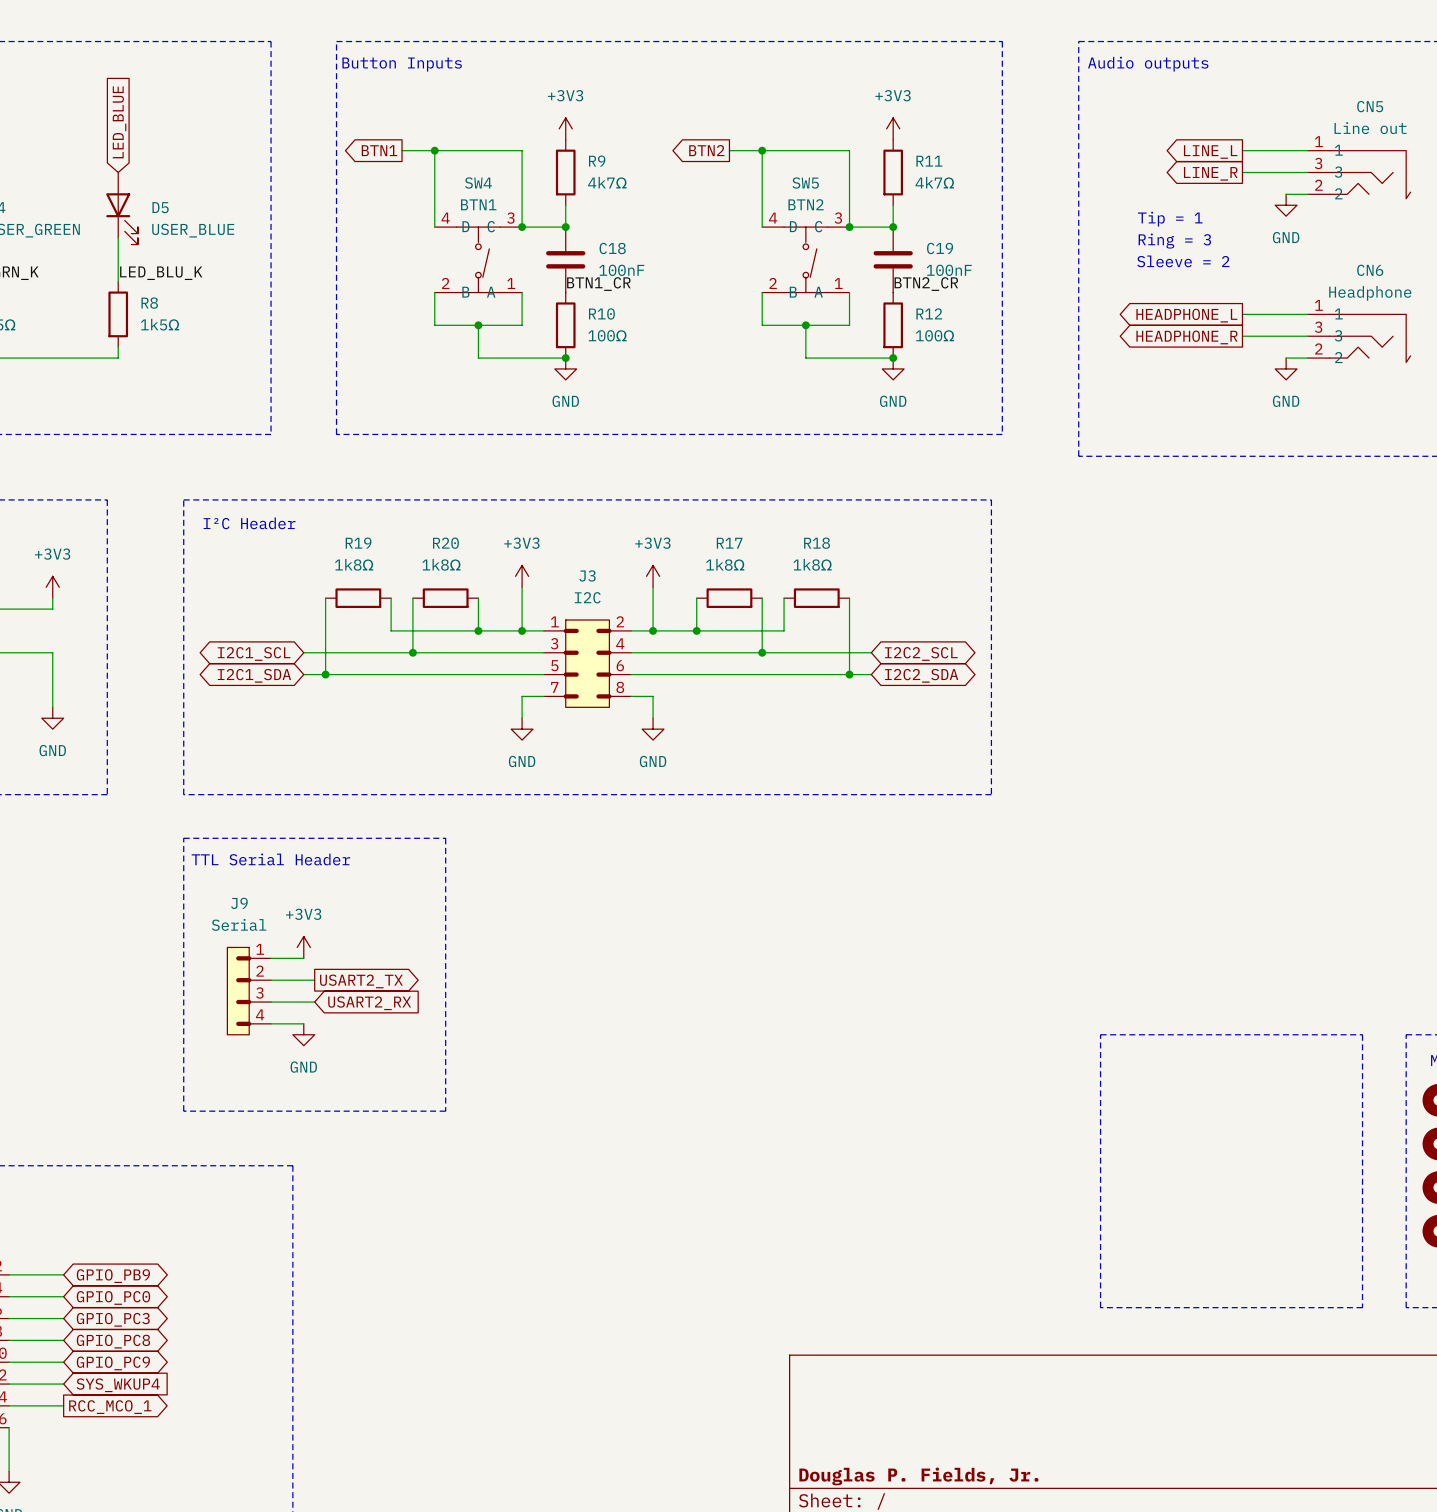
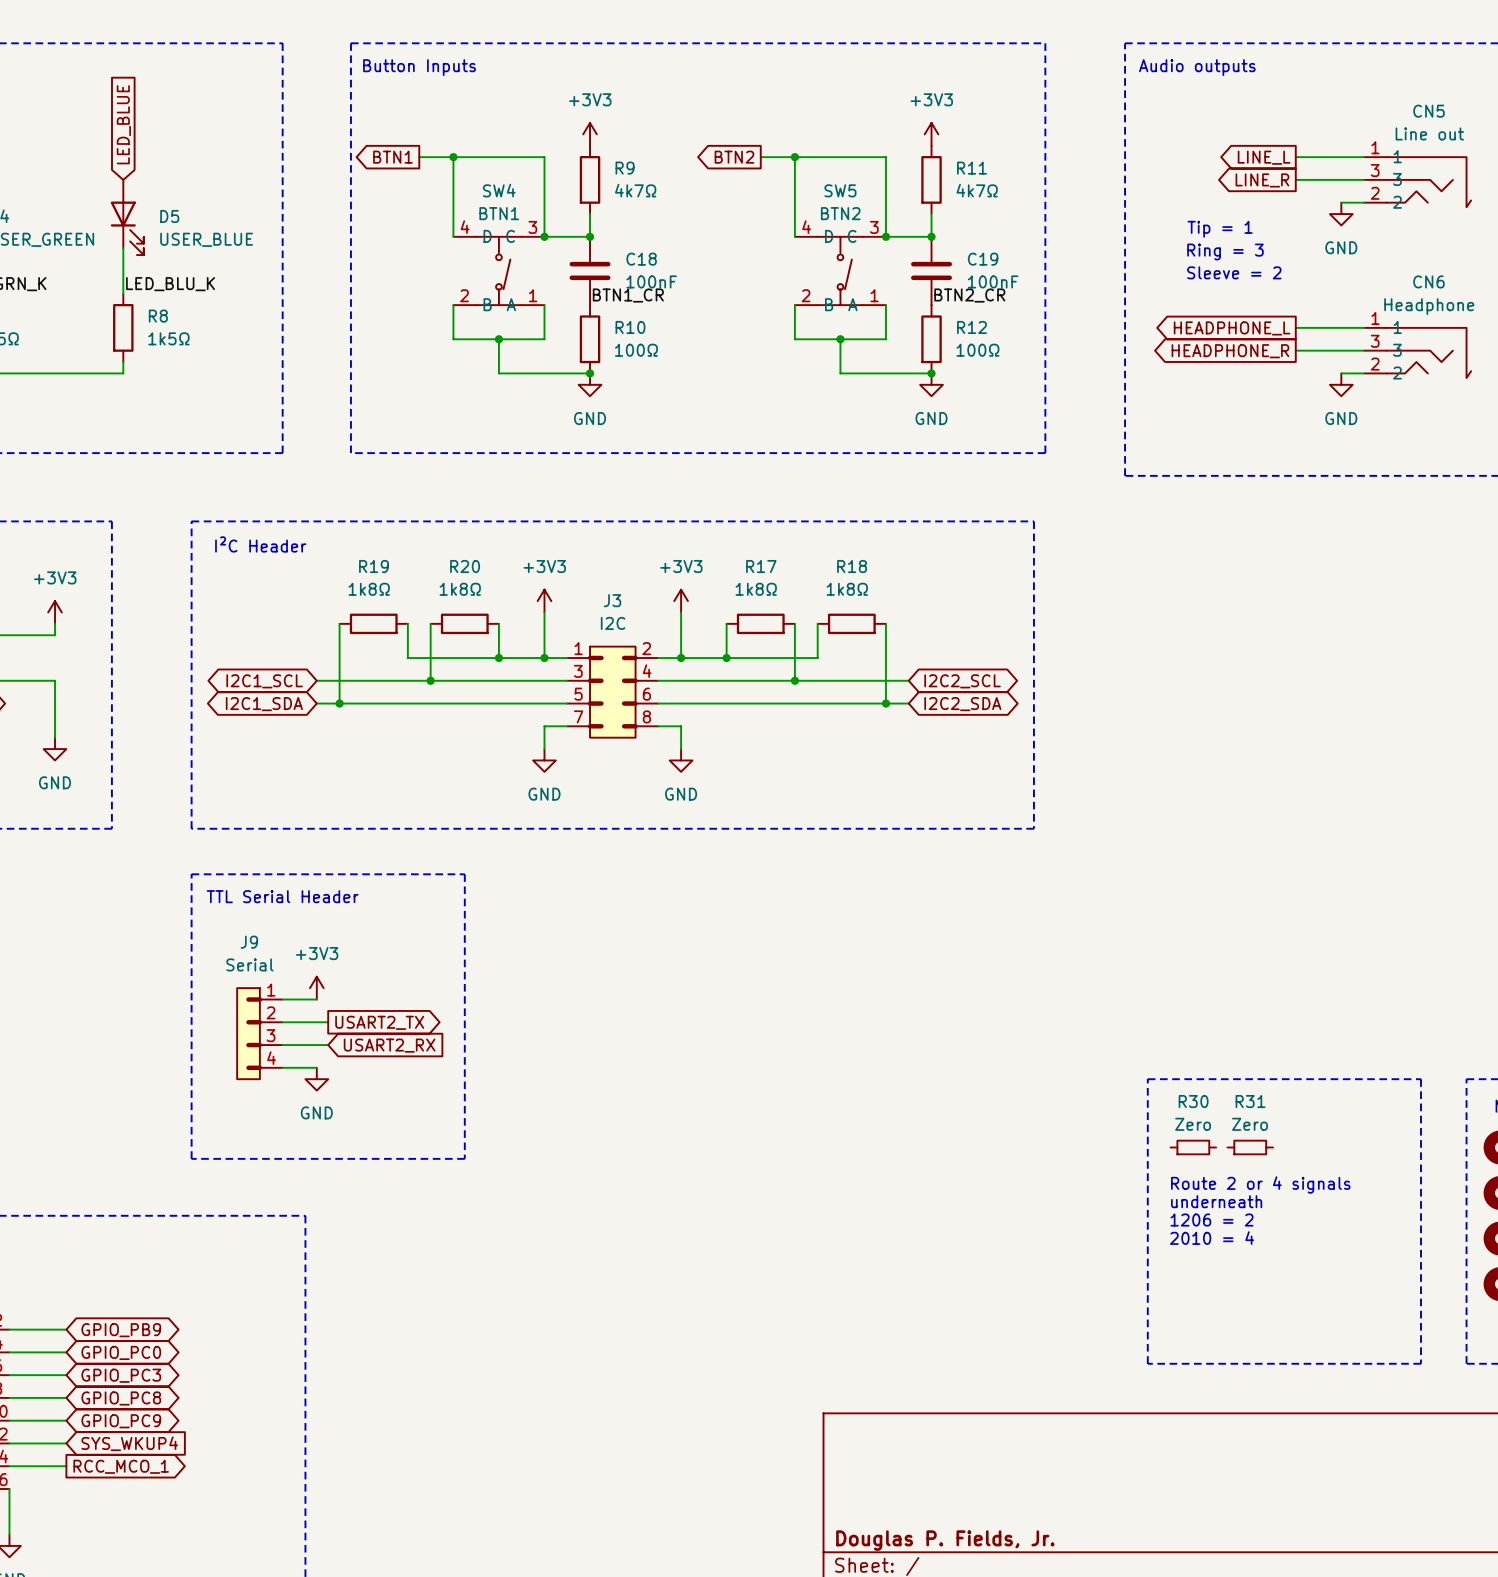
R30: none -> Zero (1193, 1147)
R31: none -> Zero (1250, 1147)
text: none -> Route 2 or 4 signals (1260, 1184)
text: none -> underneath (1216, 1201)
text: none -> 1206 = 2 (1212, 1220)
text: none -> 2010 = 4 (1212, 1238)

